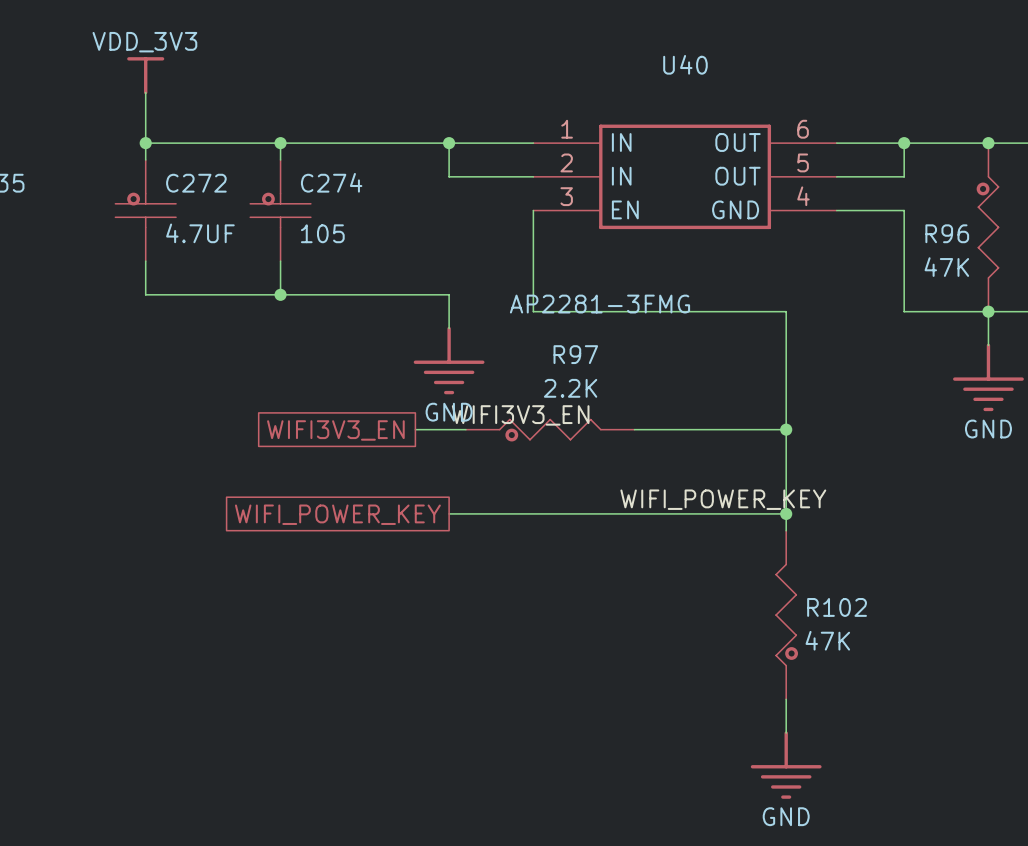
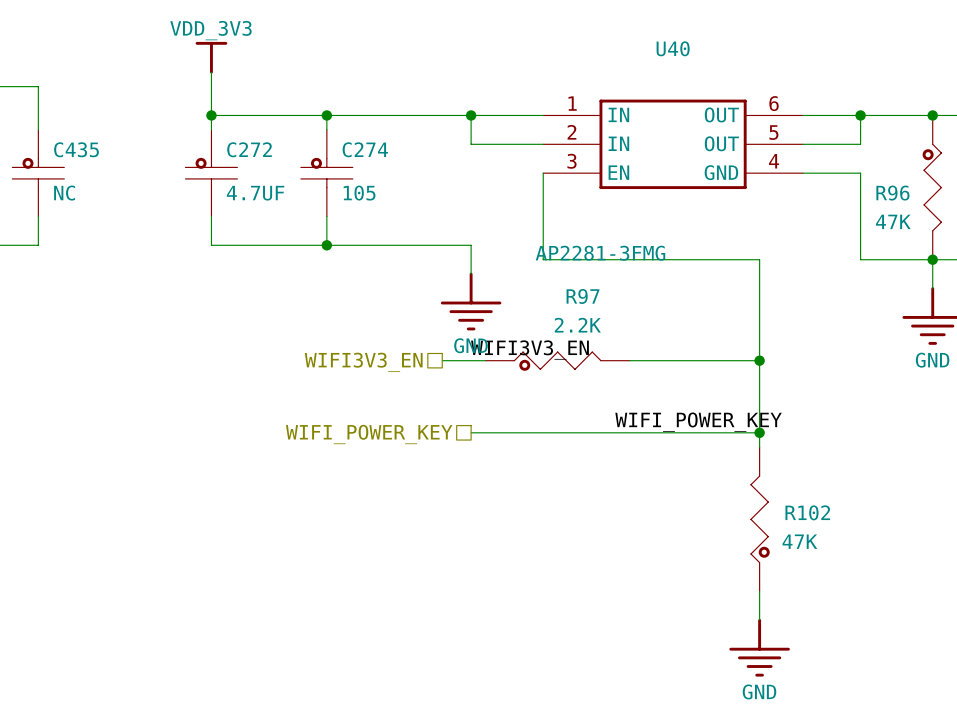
hierarchical label: none -> WIFI3V3_EN (363, 362)
global label: WIFI3V3_EN (335, 430) -> none
hierarchical label: none -> WIFI_POWER_KEY (369, 434)
global label: WIFI_POWER_KEY (337, 514) -> none

